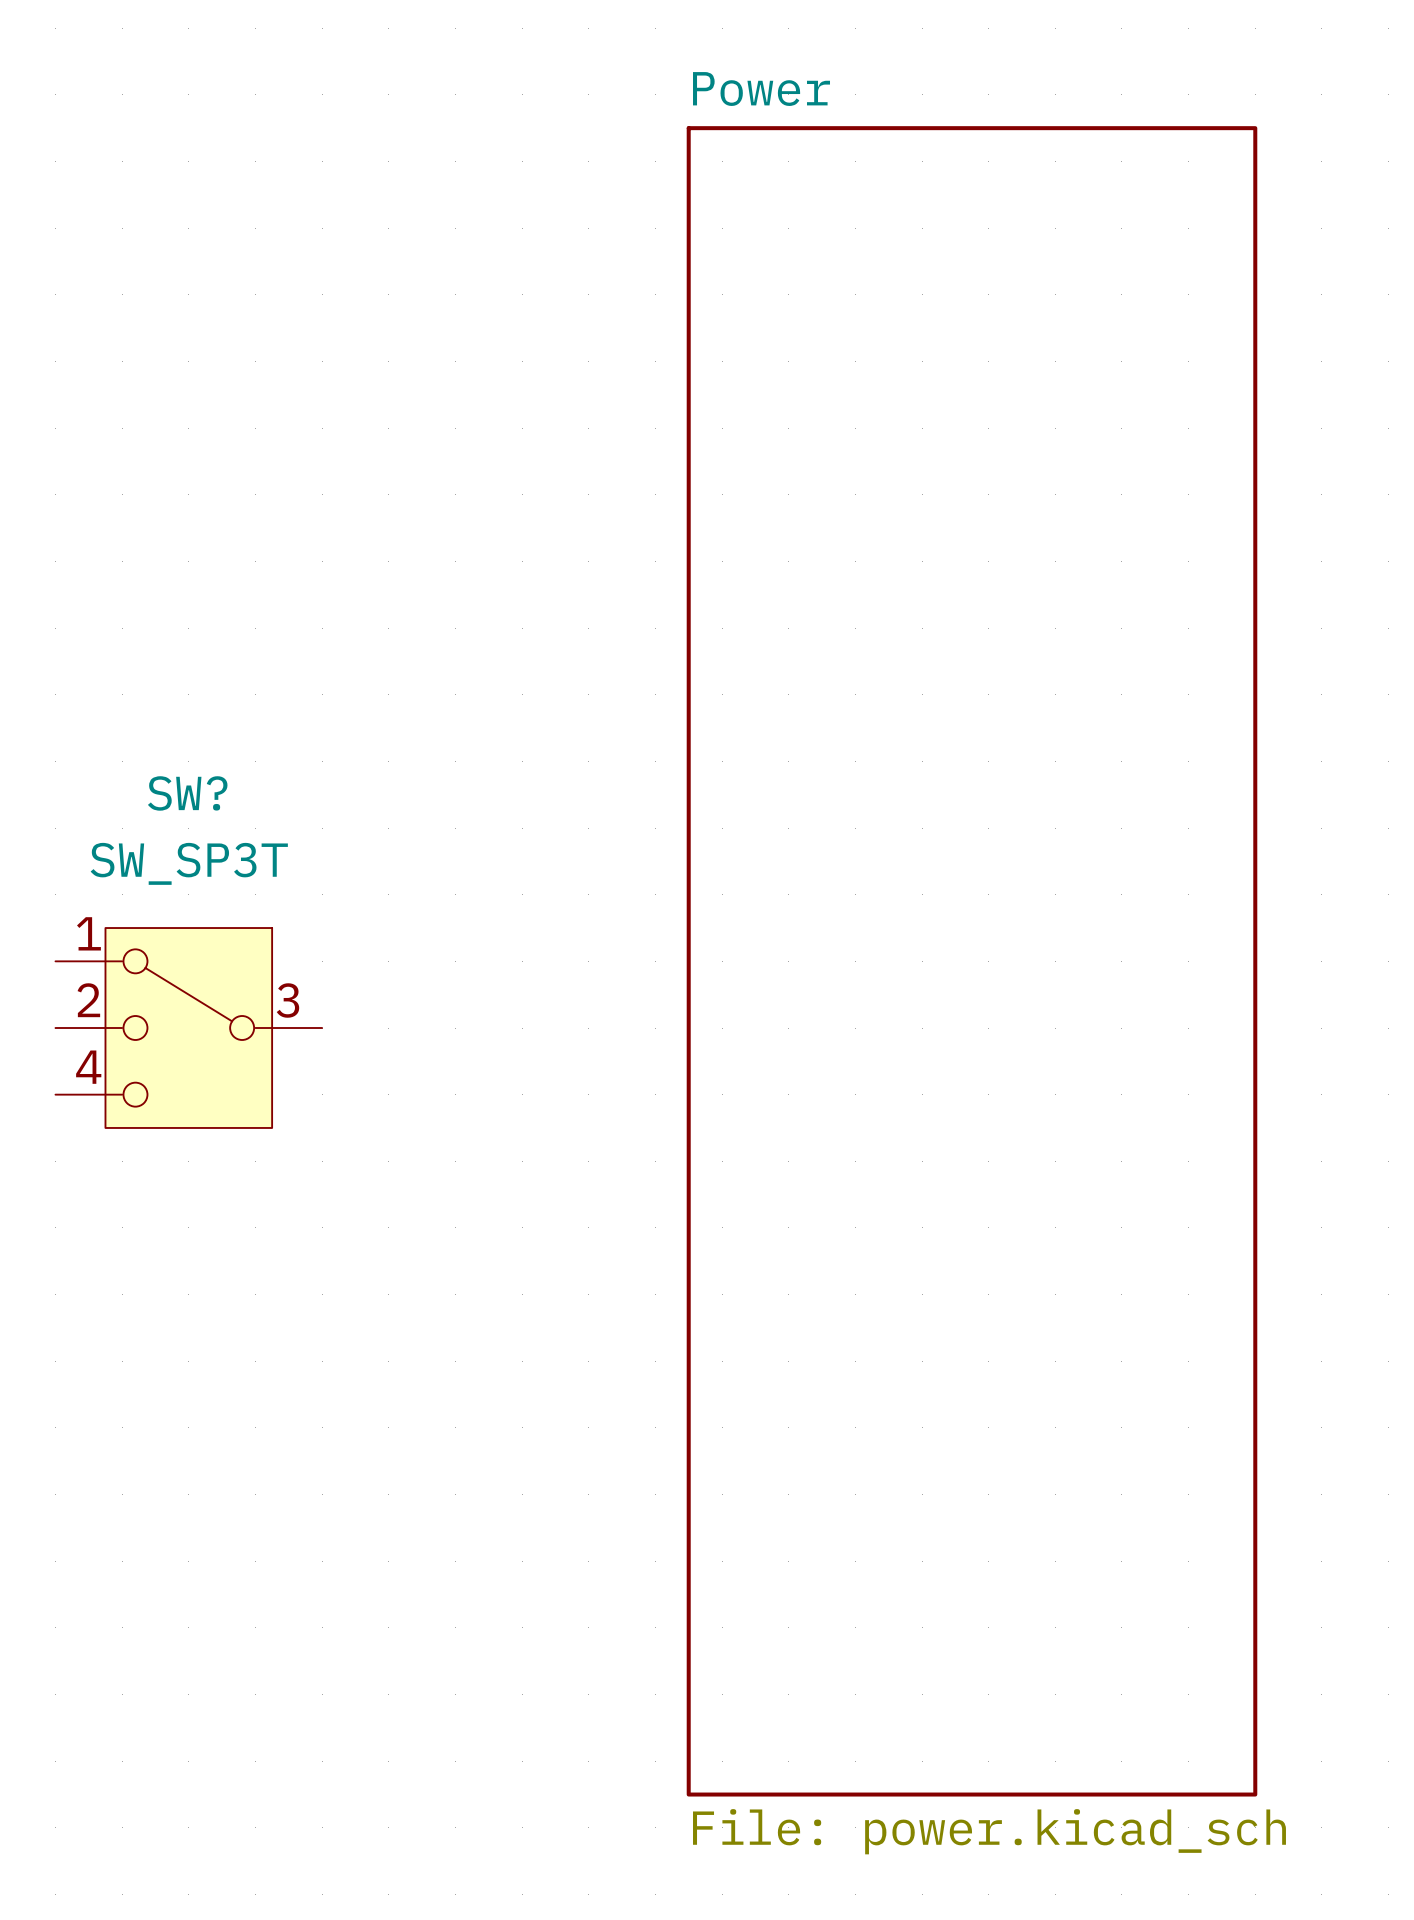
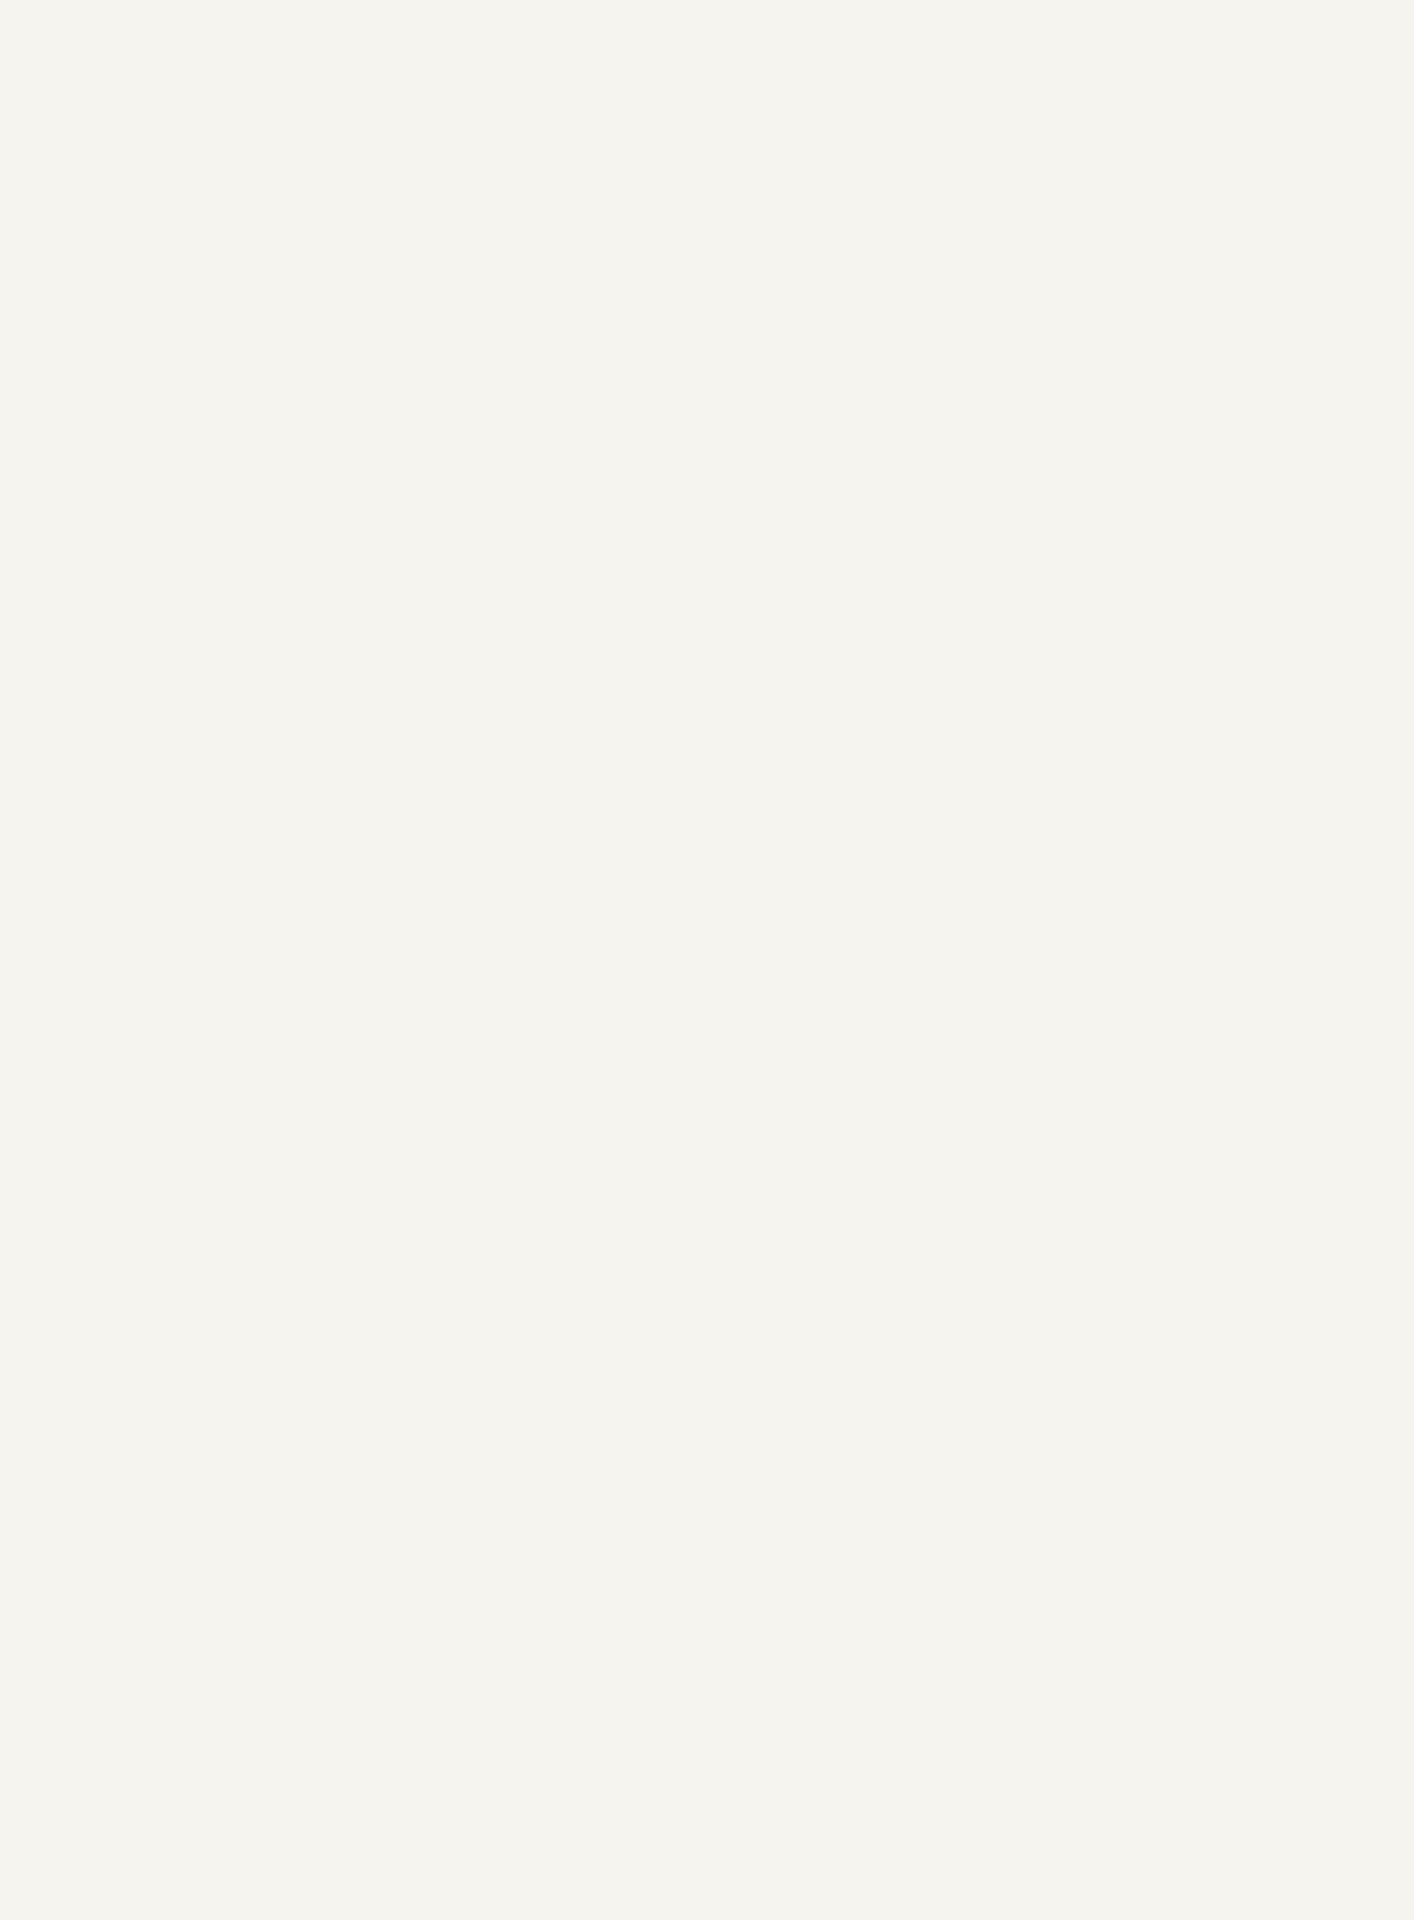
sheet Power: File: power.kicad_sch (972, 961) -> none
SW?: SW_SP3T (188, 1028) -> none

